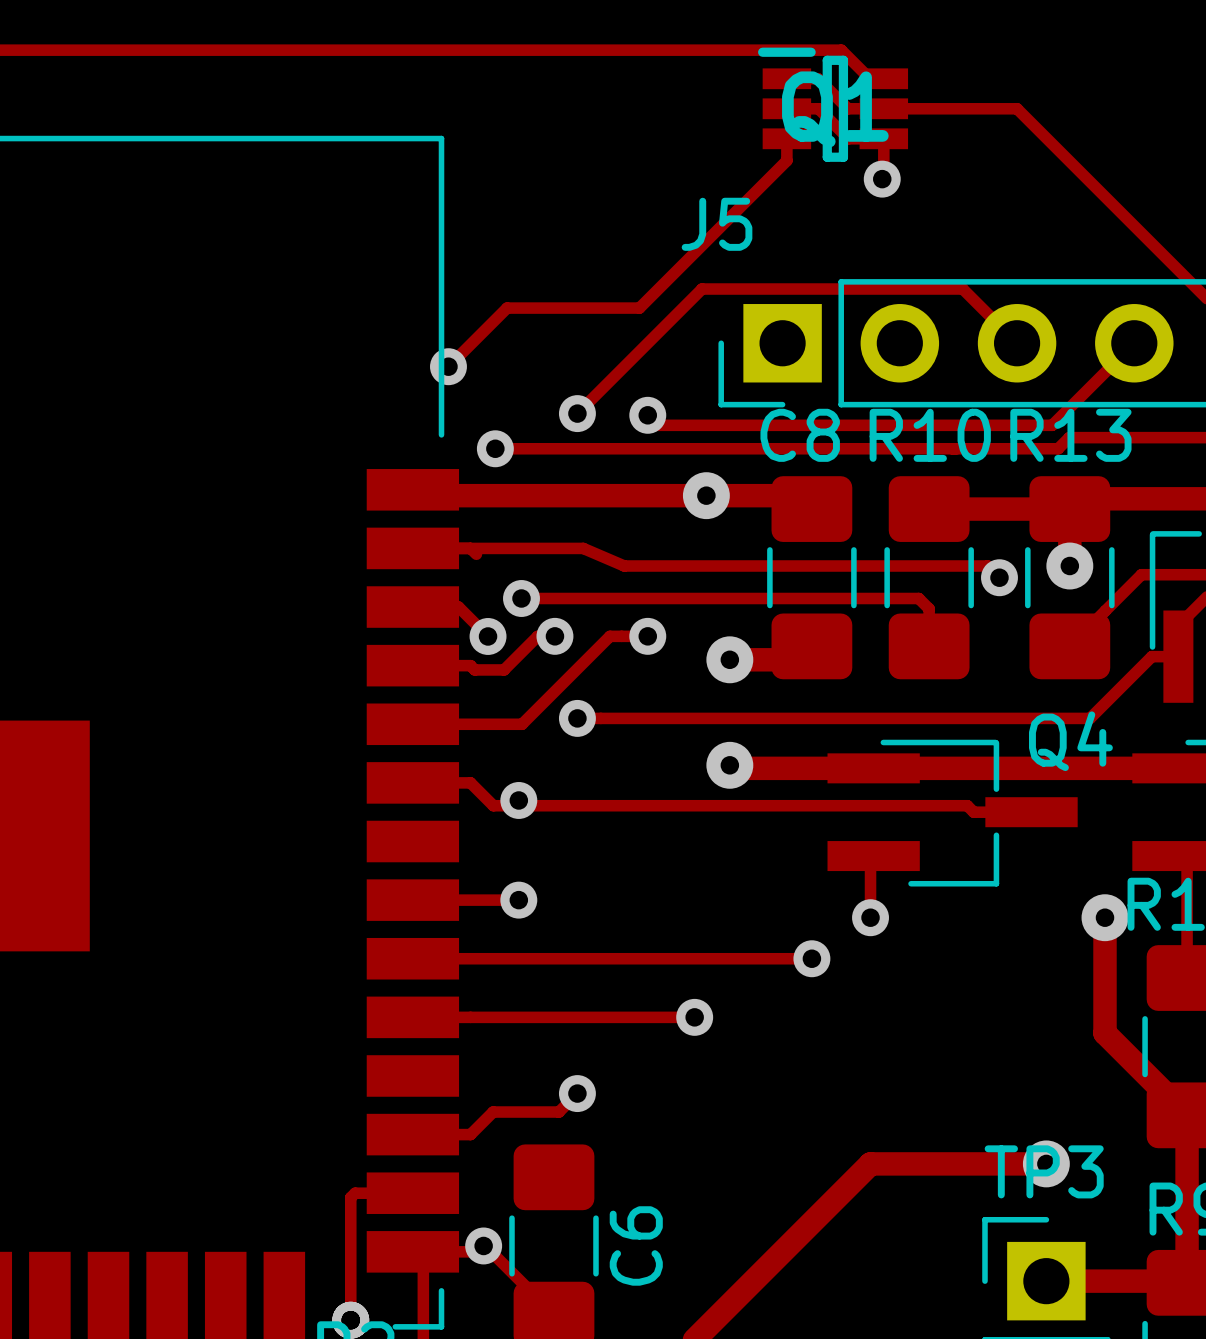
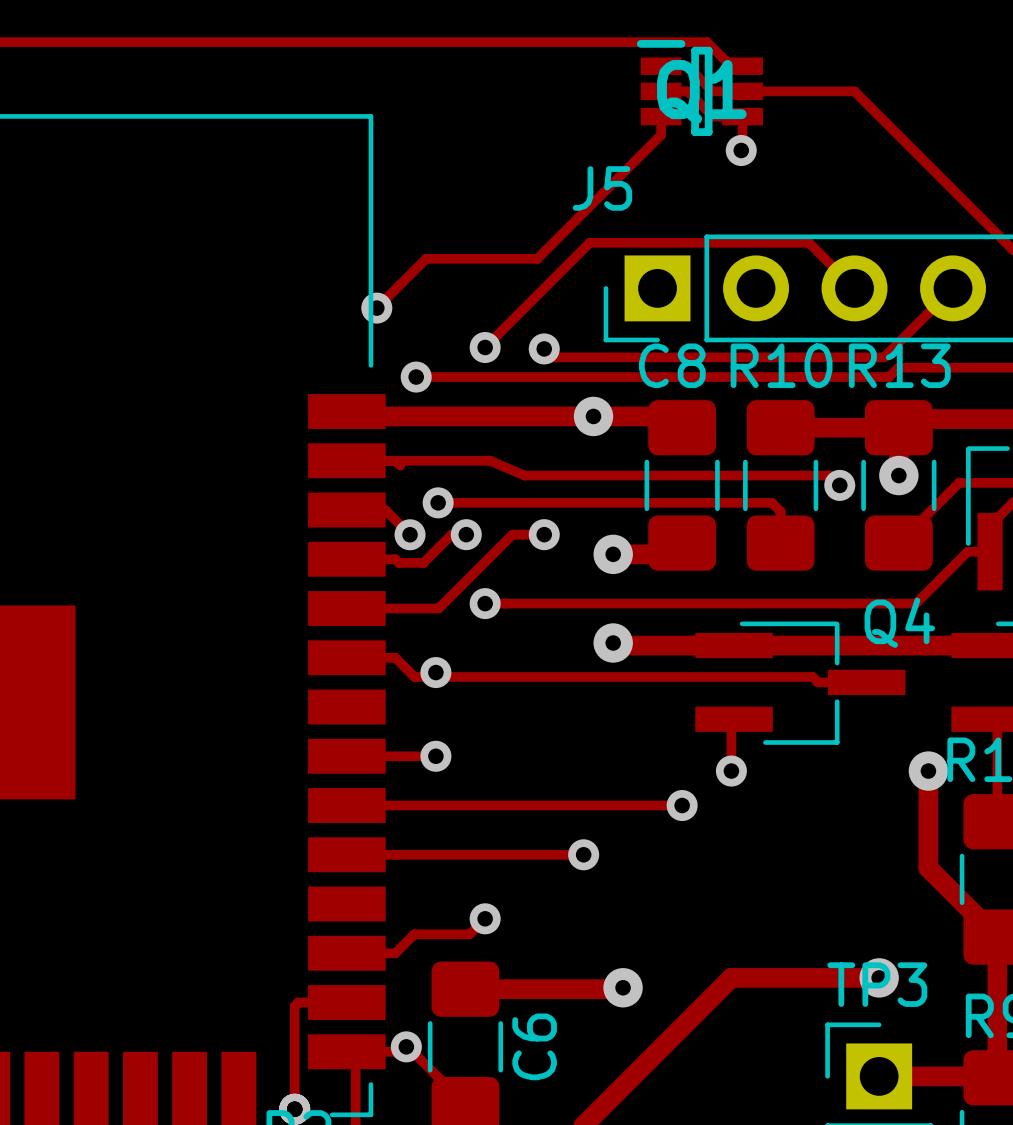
track: none -> (623, 987) (465, 989)
via: none -> (623, 987)

